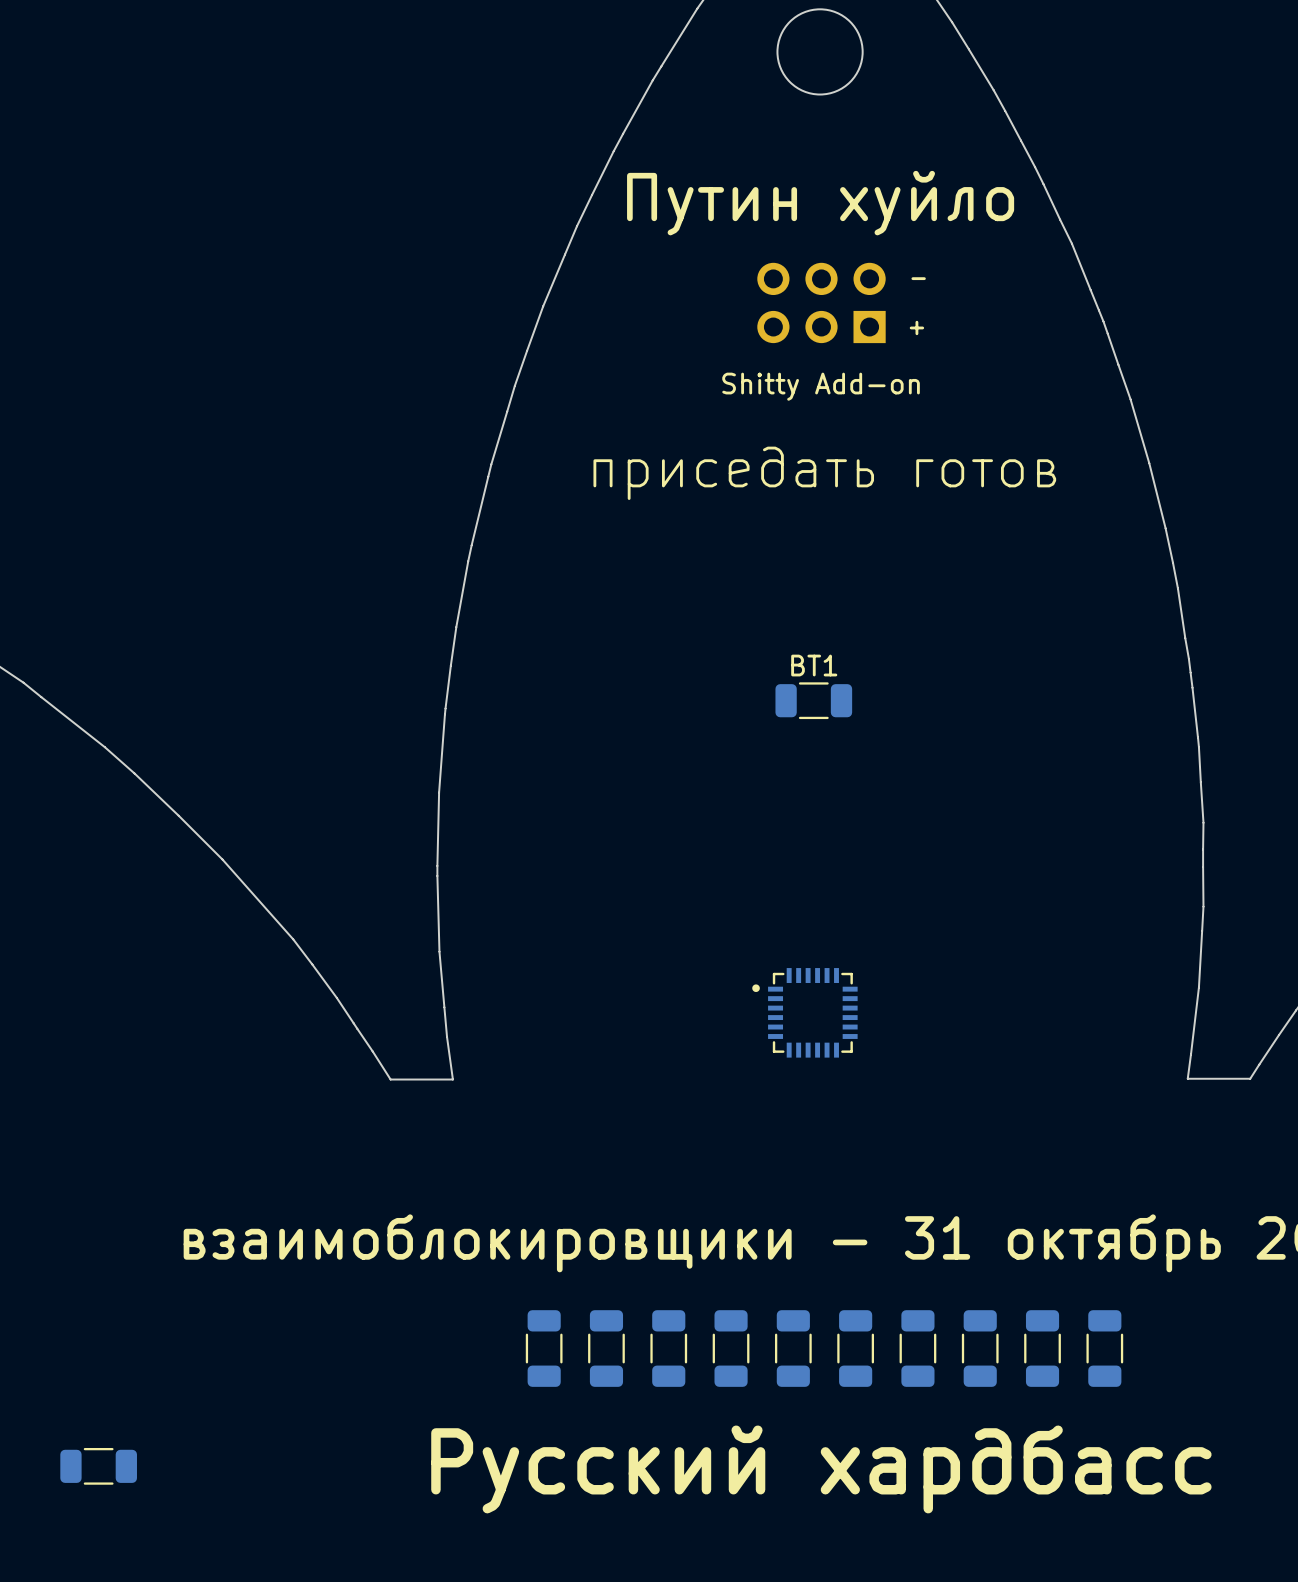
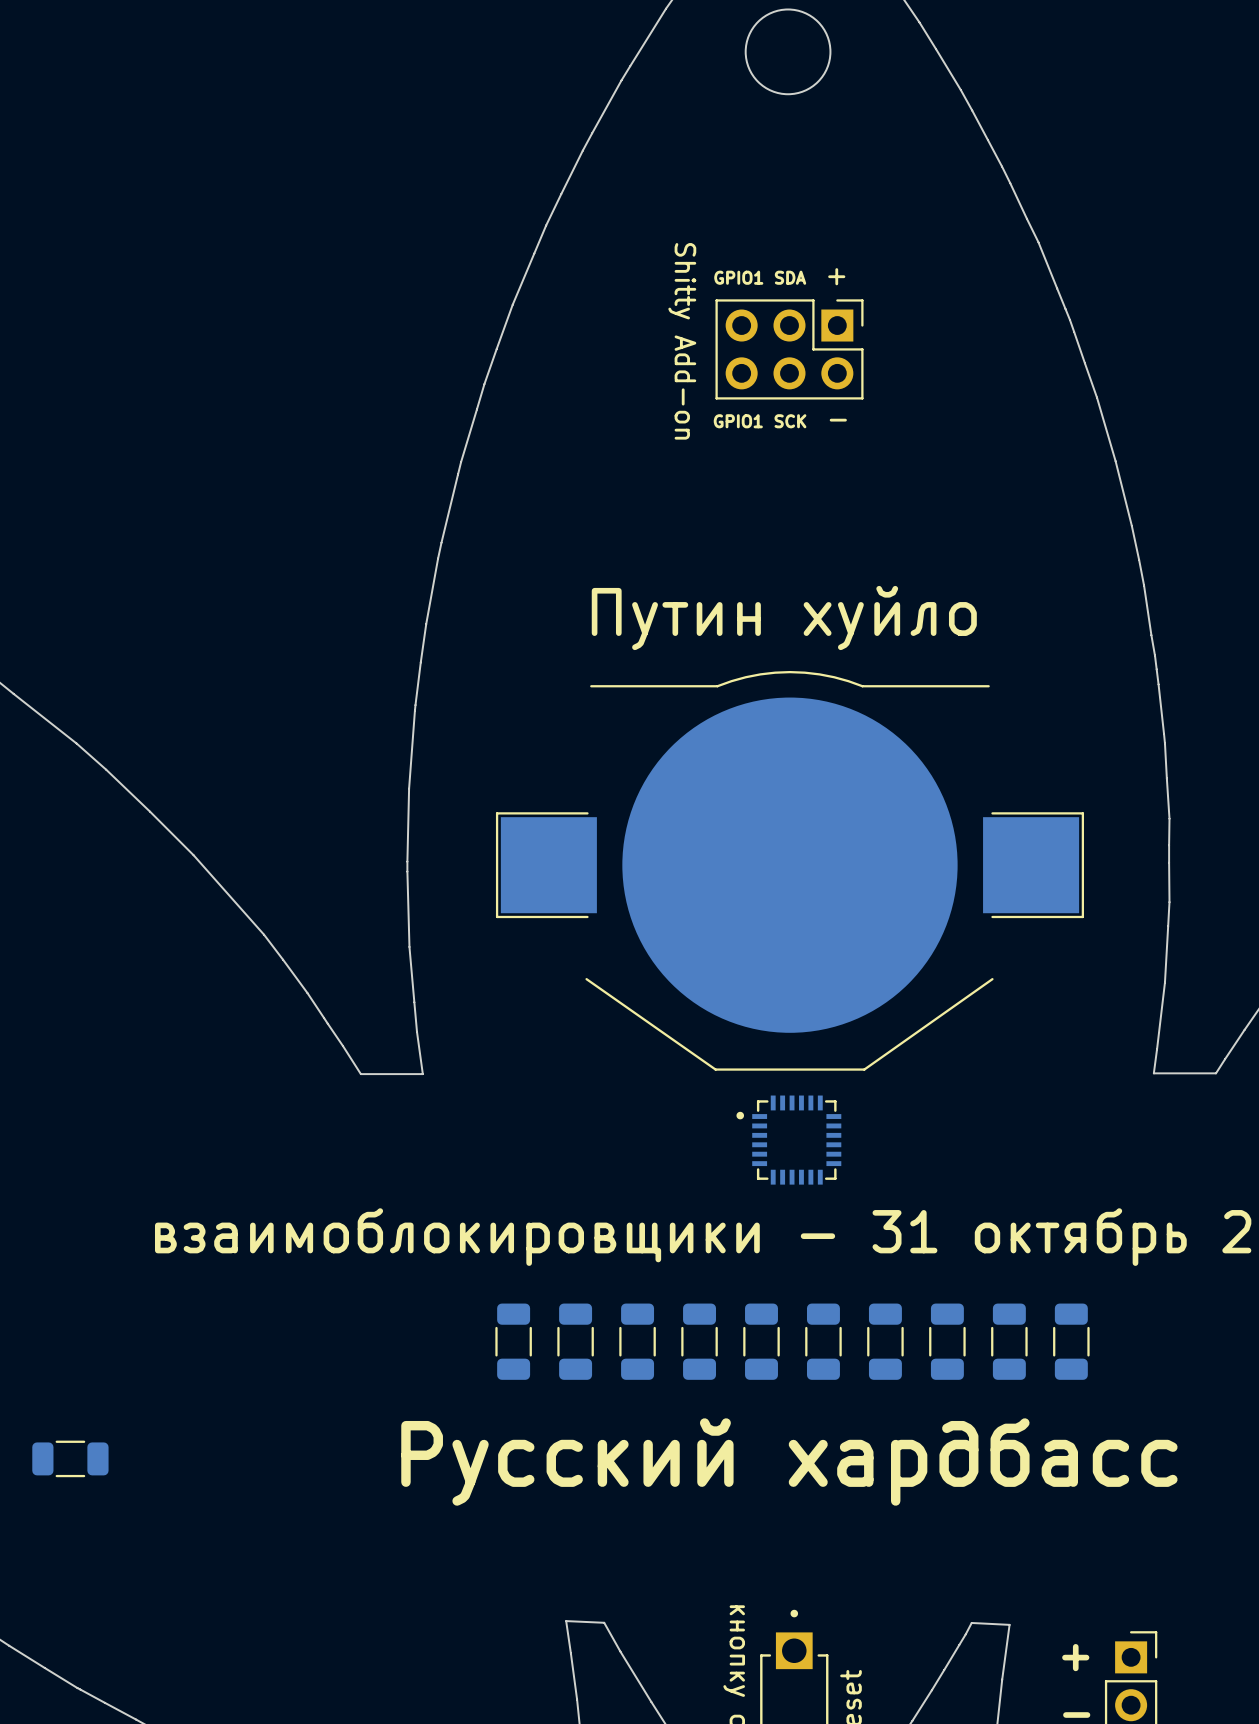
text position: Путин хуйло (820, 203) -> Путин хуйло (784, 618)
text: none -> GPIO1 (738, 277)
text: none -> SDA (790, 277)
text position: - (918, 278) -> - (838, 420)
part side: top (821, 302) -> bottom (789, 349)
text position: + (916, 327) -> + (836, 276)
text: none -> GPIO1 (738, 421)
text: none -> SCK (790, 421)
text: приседать готов (824, 473) -> none
BT1: (813, 700) -> none
part: none -> (789, 870)
part position: (804, 1012) -> (788, 1140)

